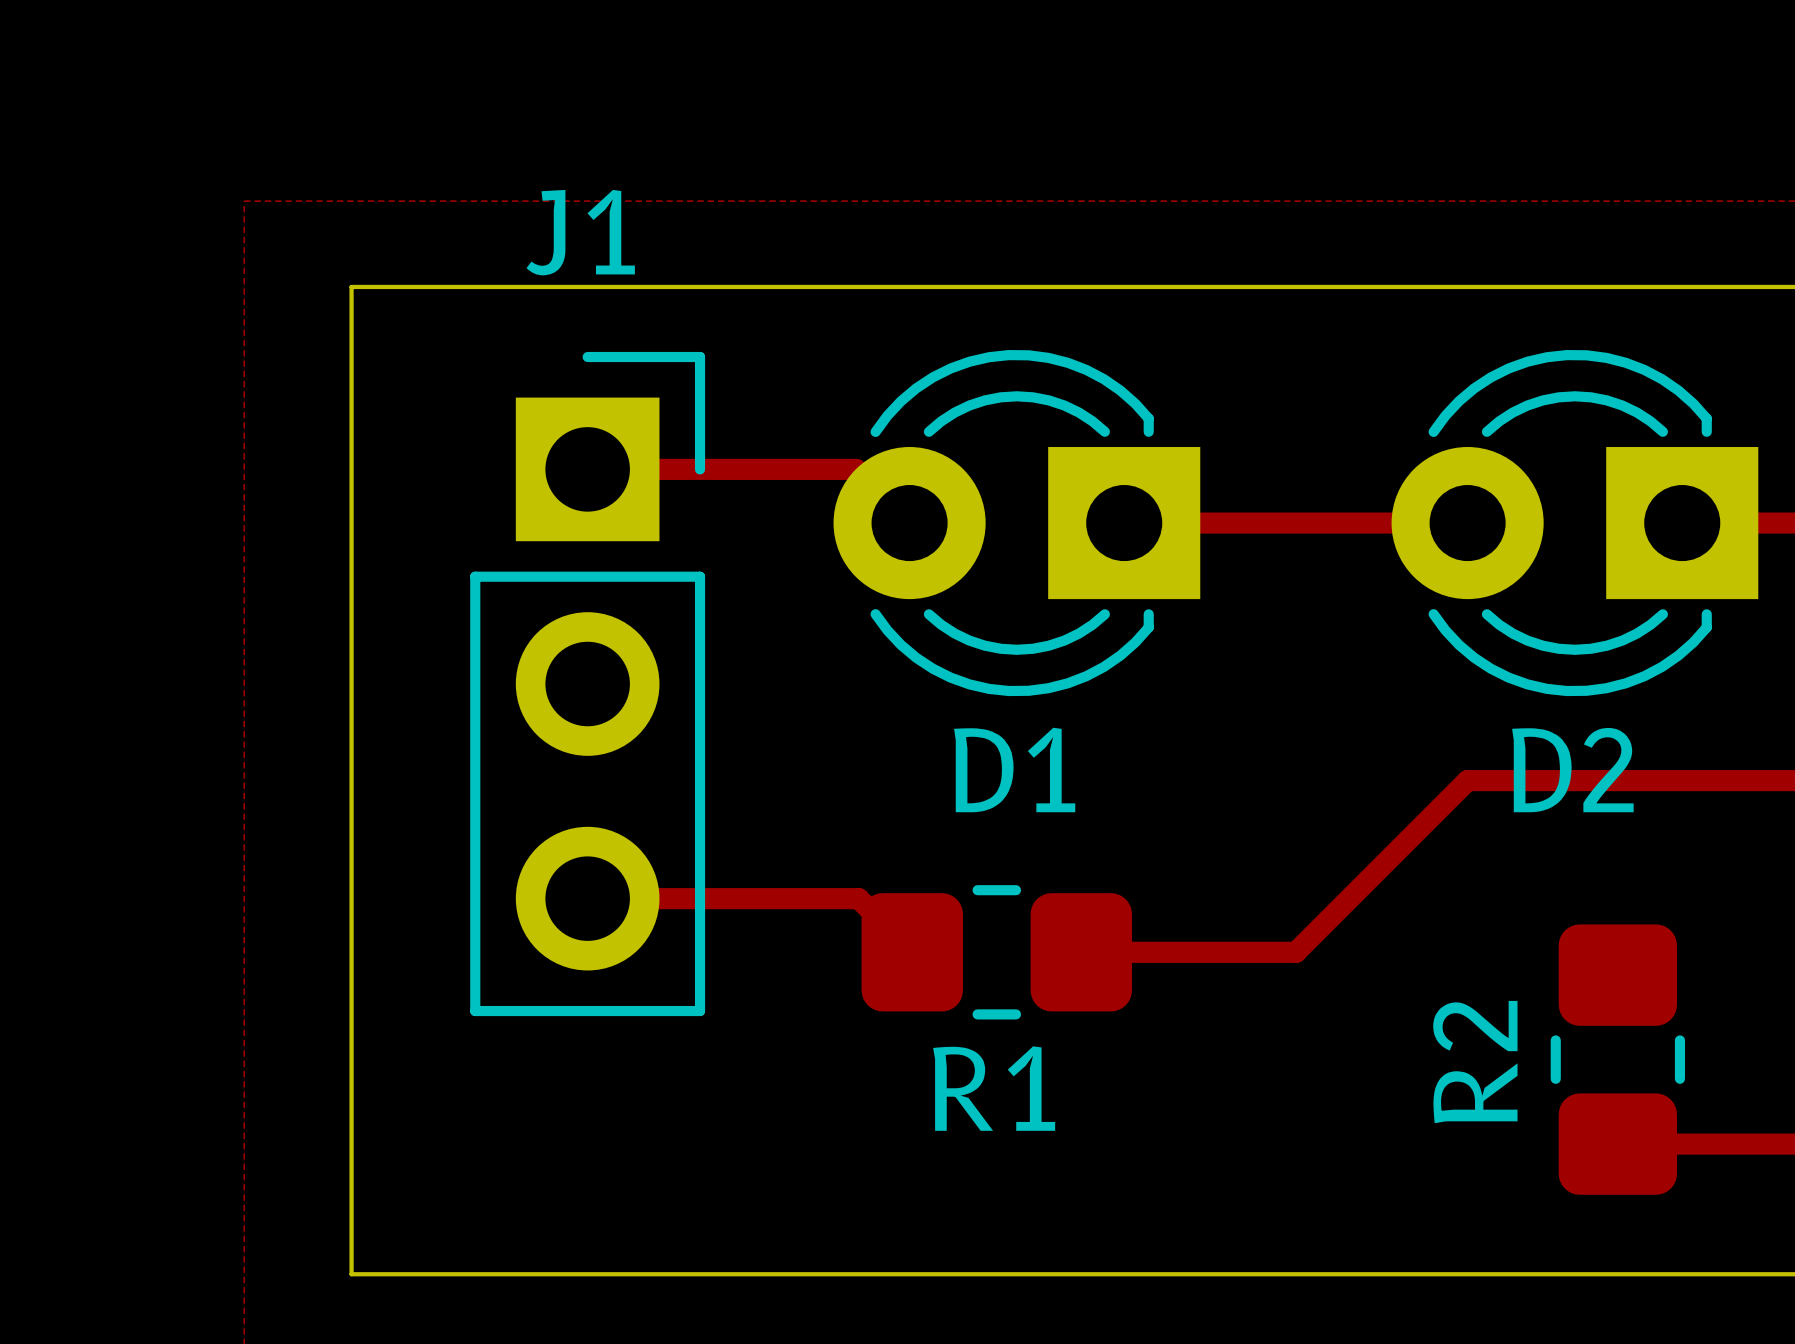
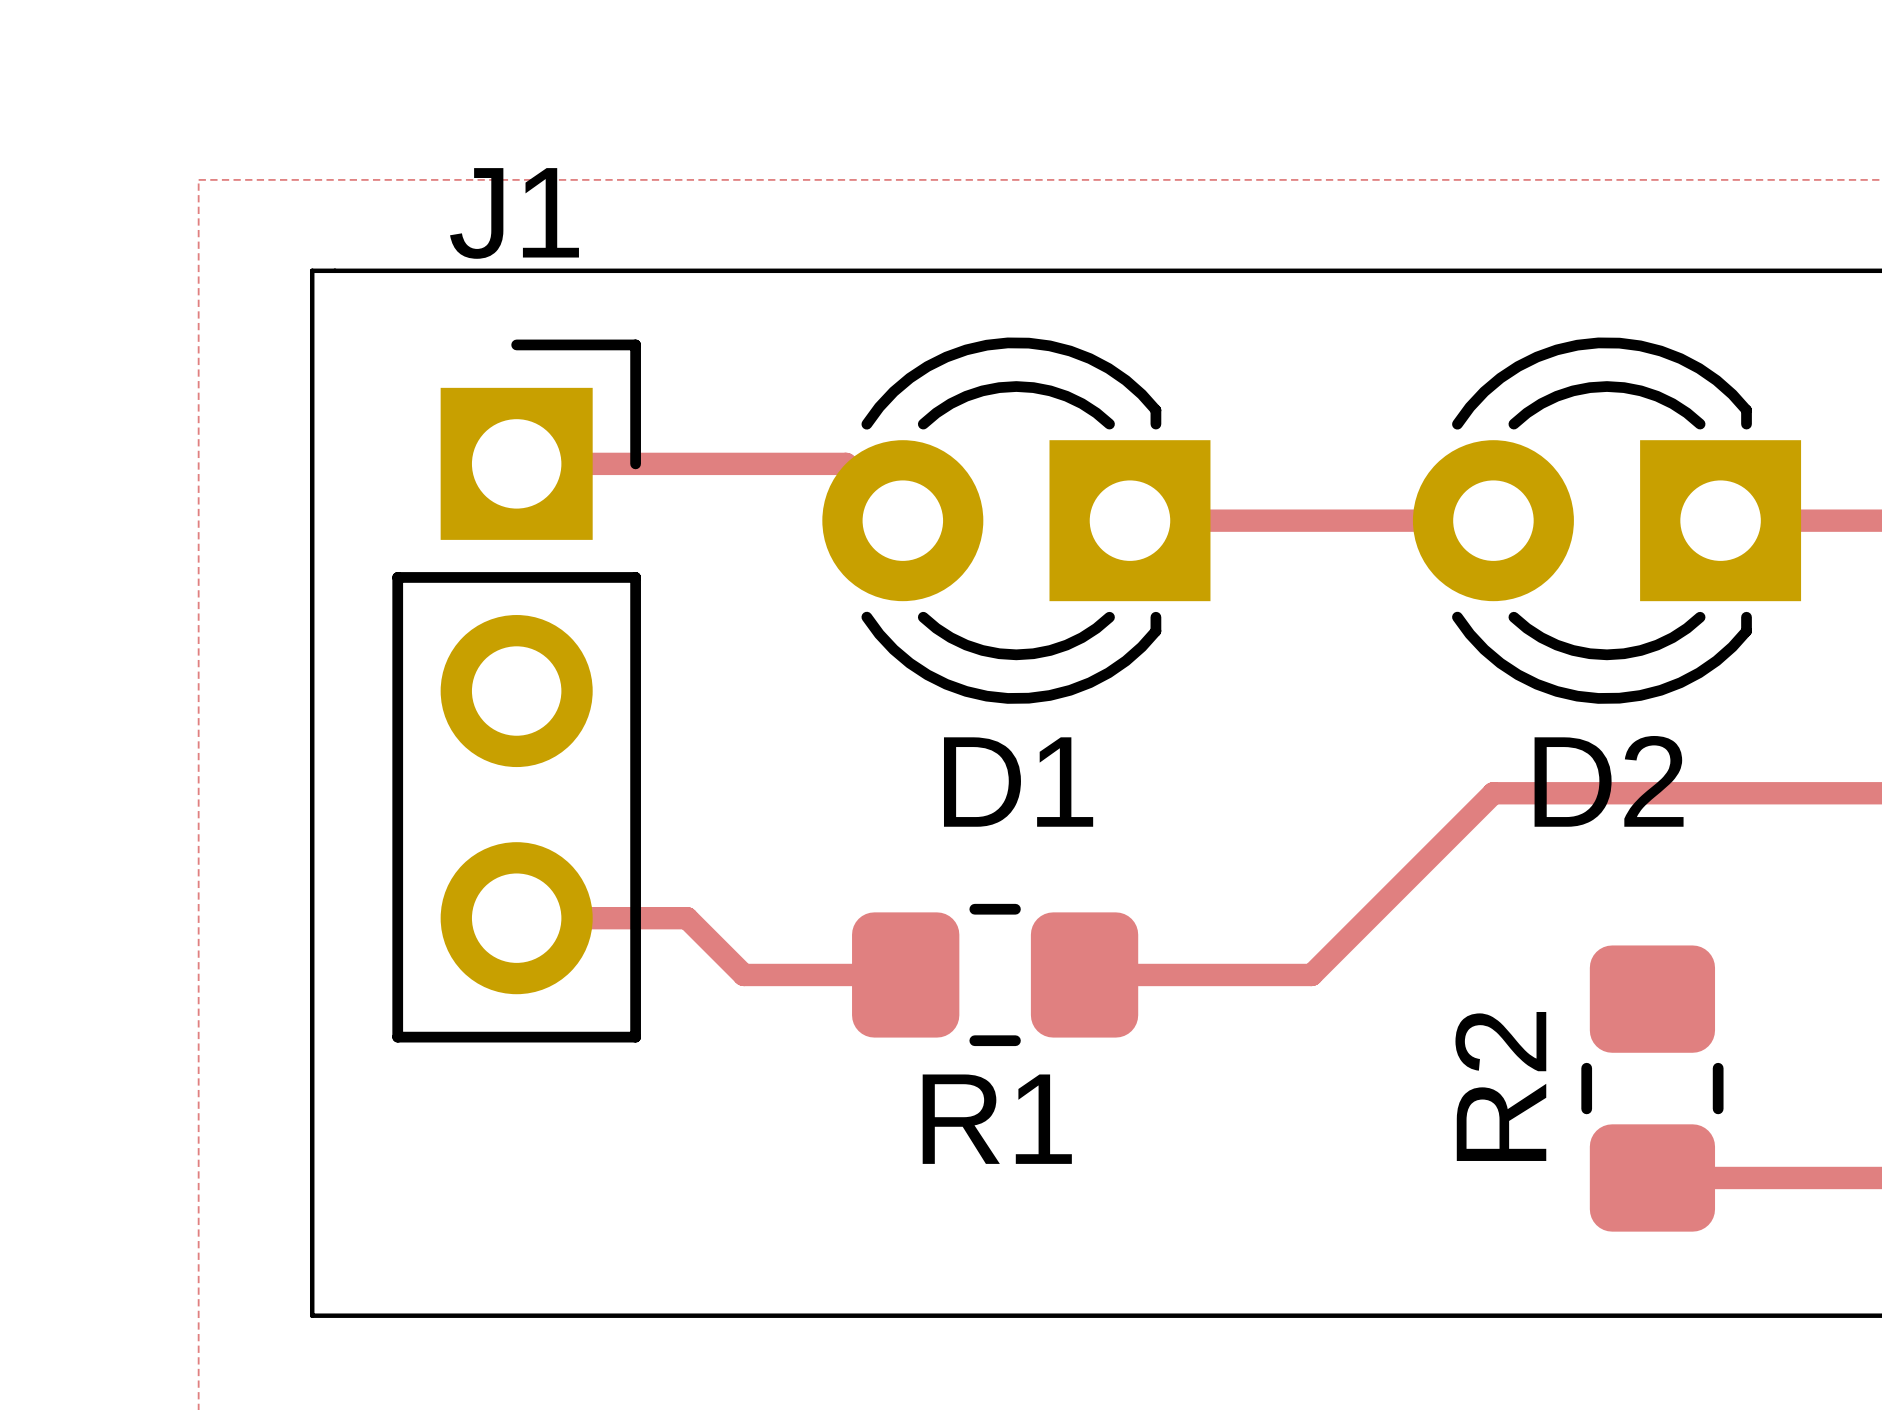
J1 position: (587, 684) -> (516, 691)
top track: (705, 898) (858, 898) (912, 952) -> (687, 918) (743, 974) (905, 974)

